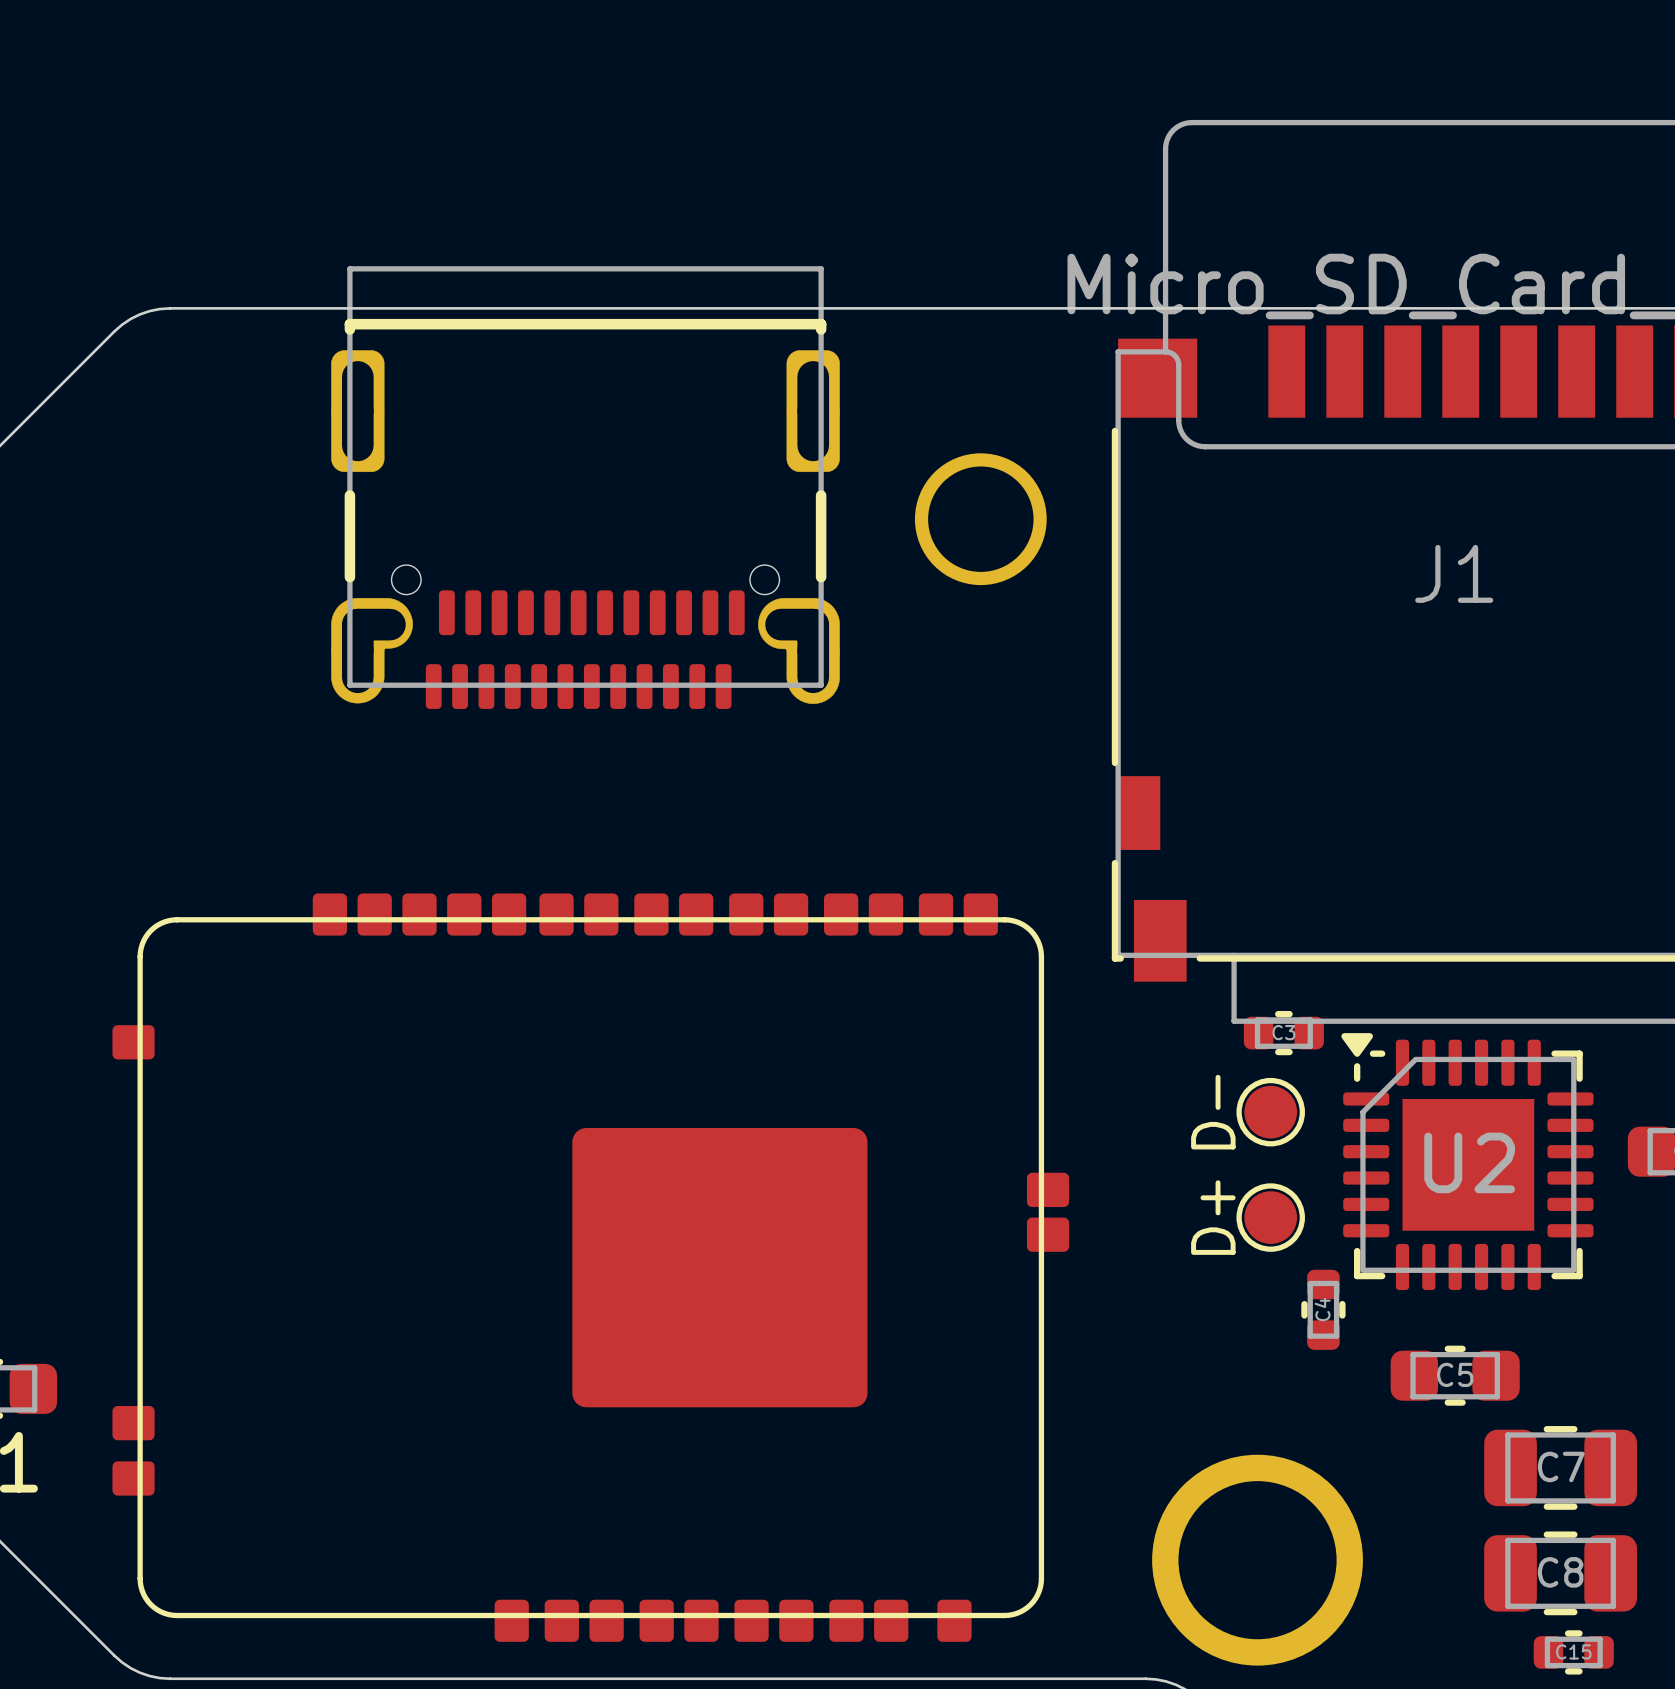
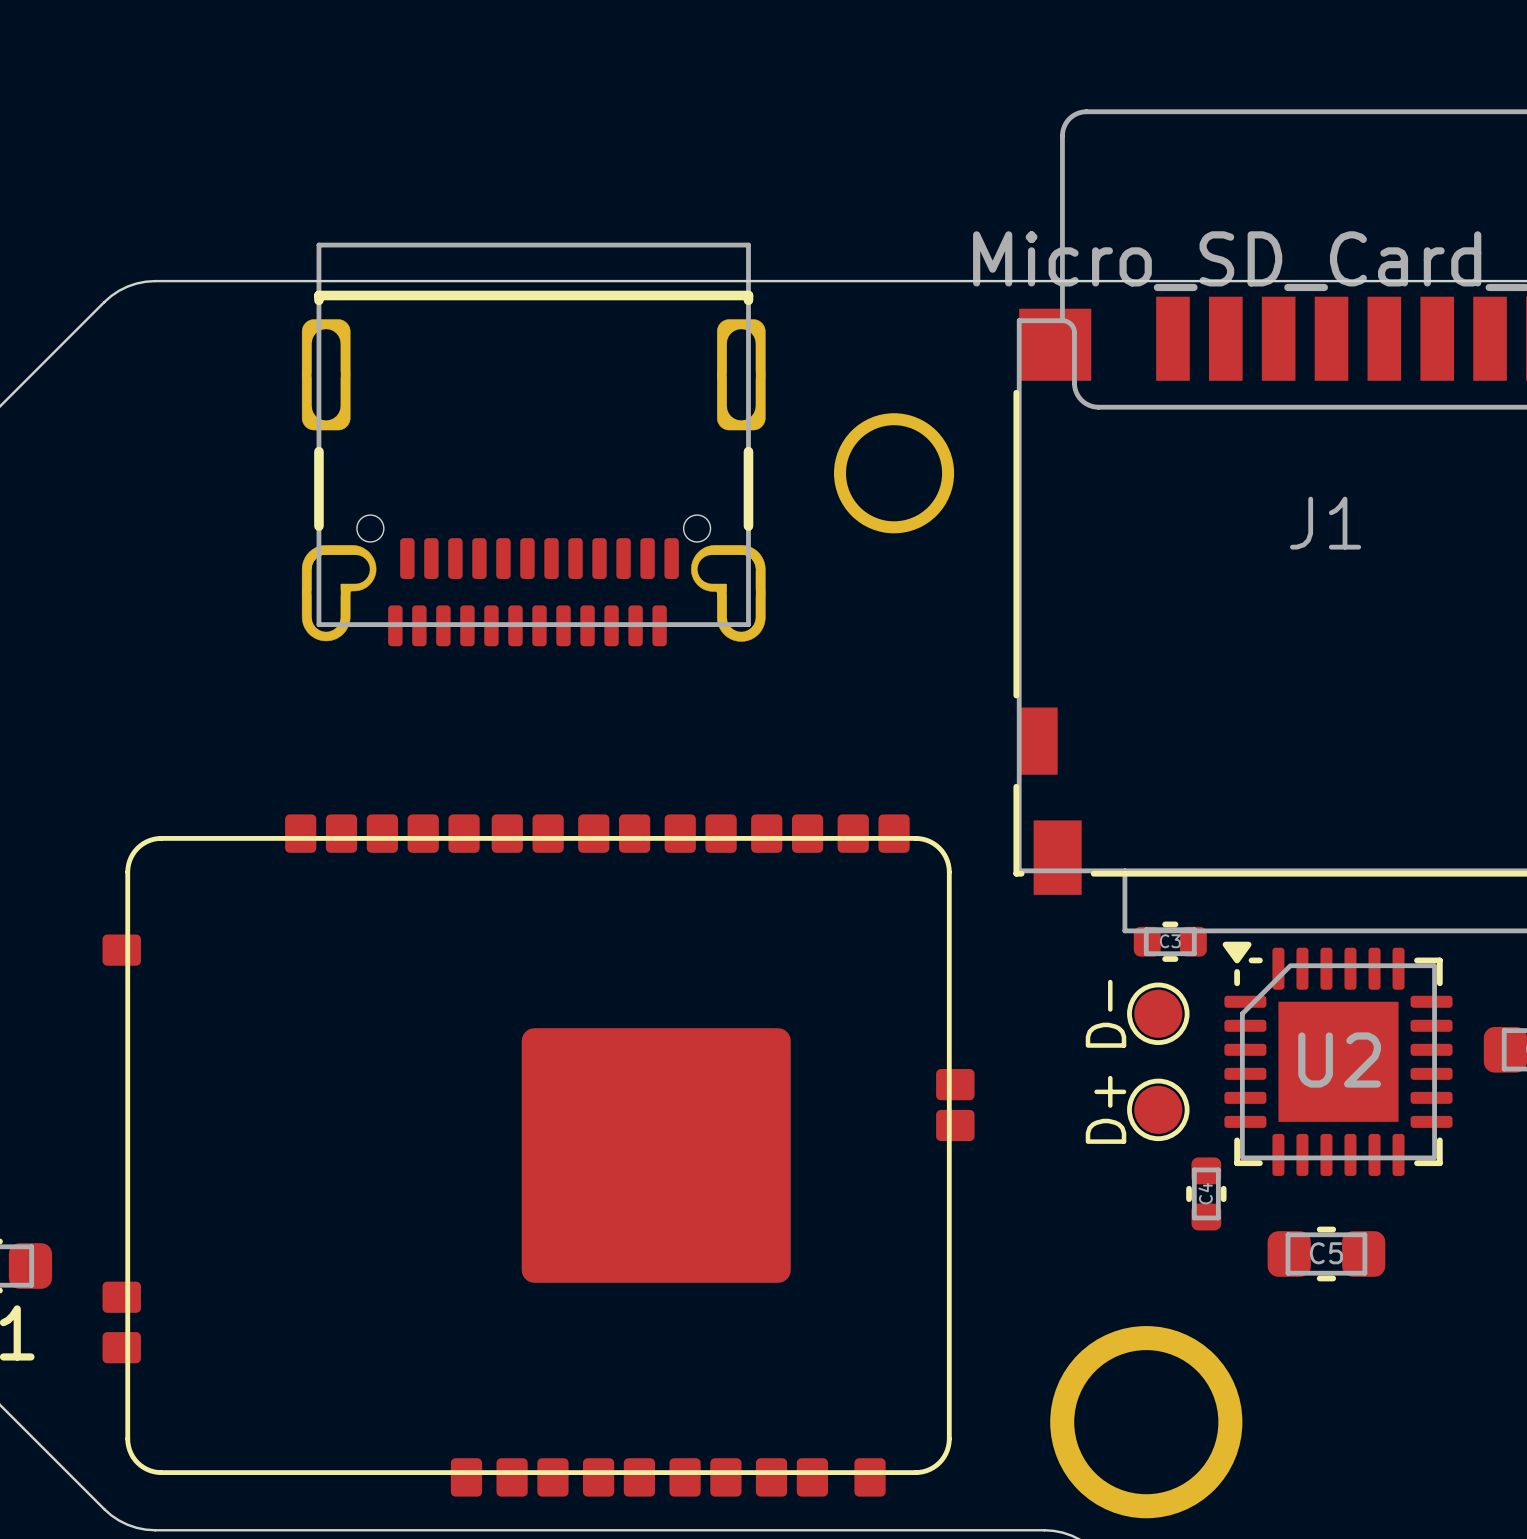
C7: (1560, 1467) -> none
C8: (1560, 1573) -> none
C15: (1573, 1652) -> none

